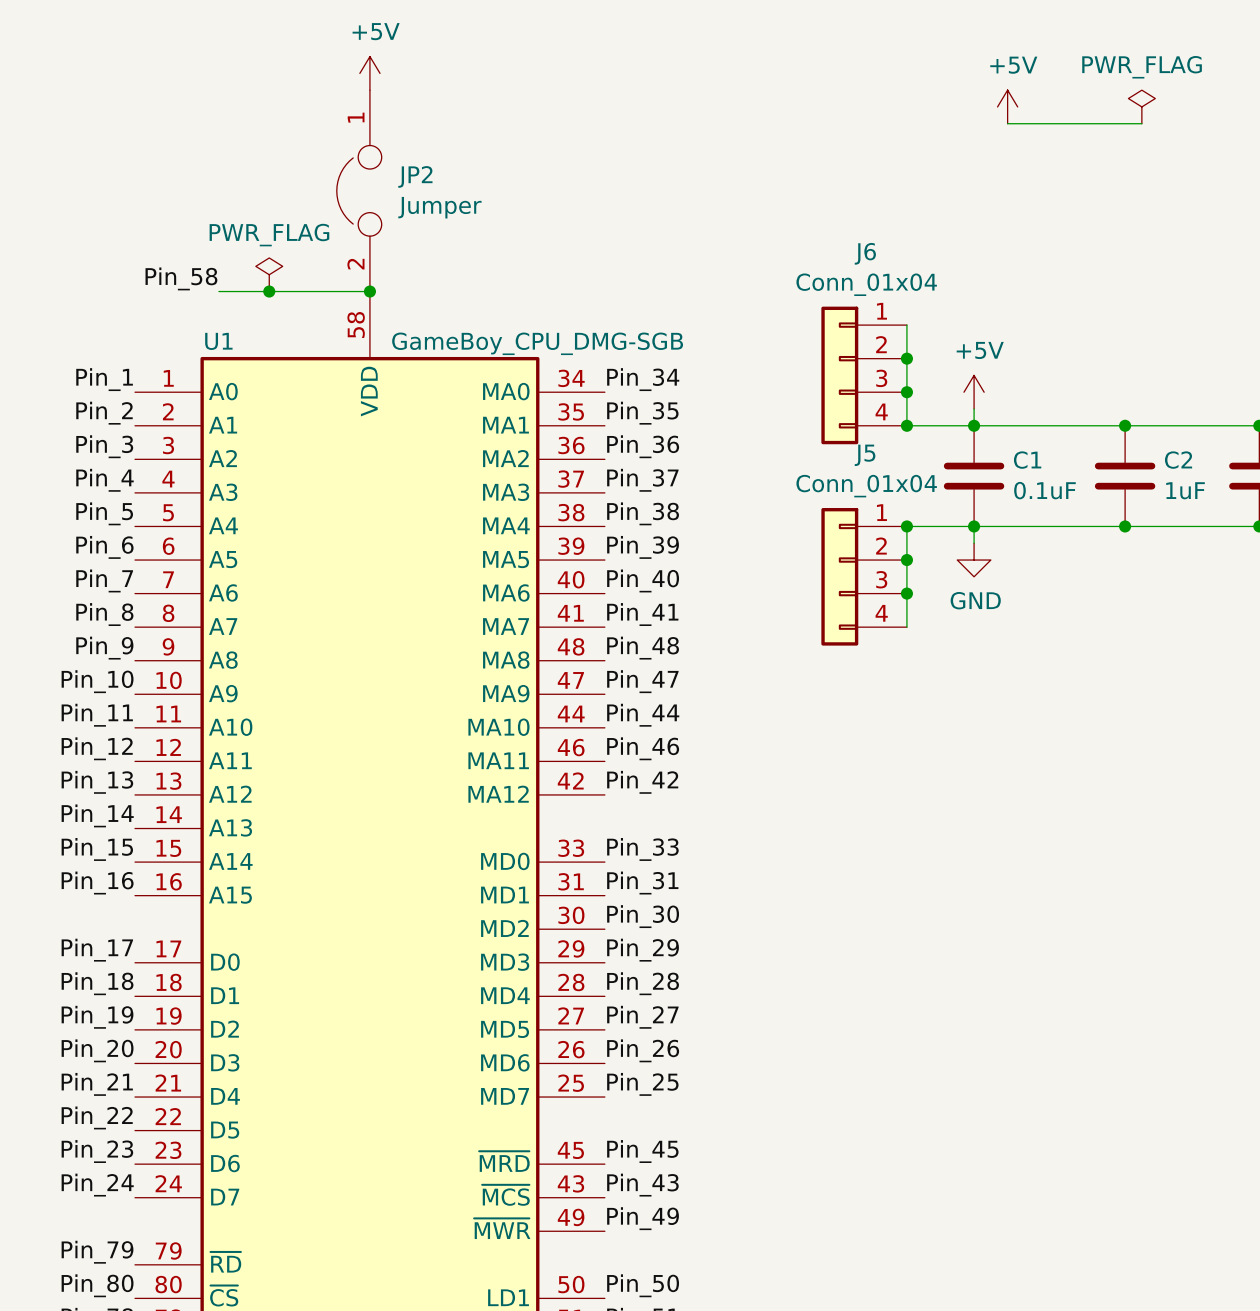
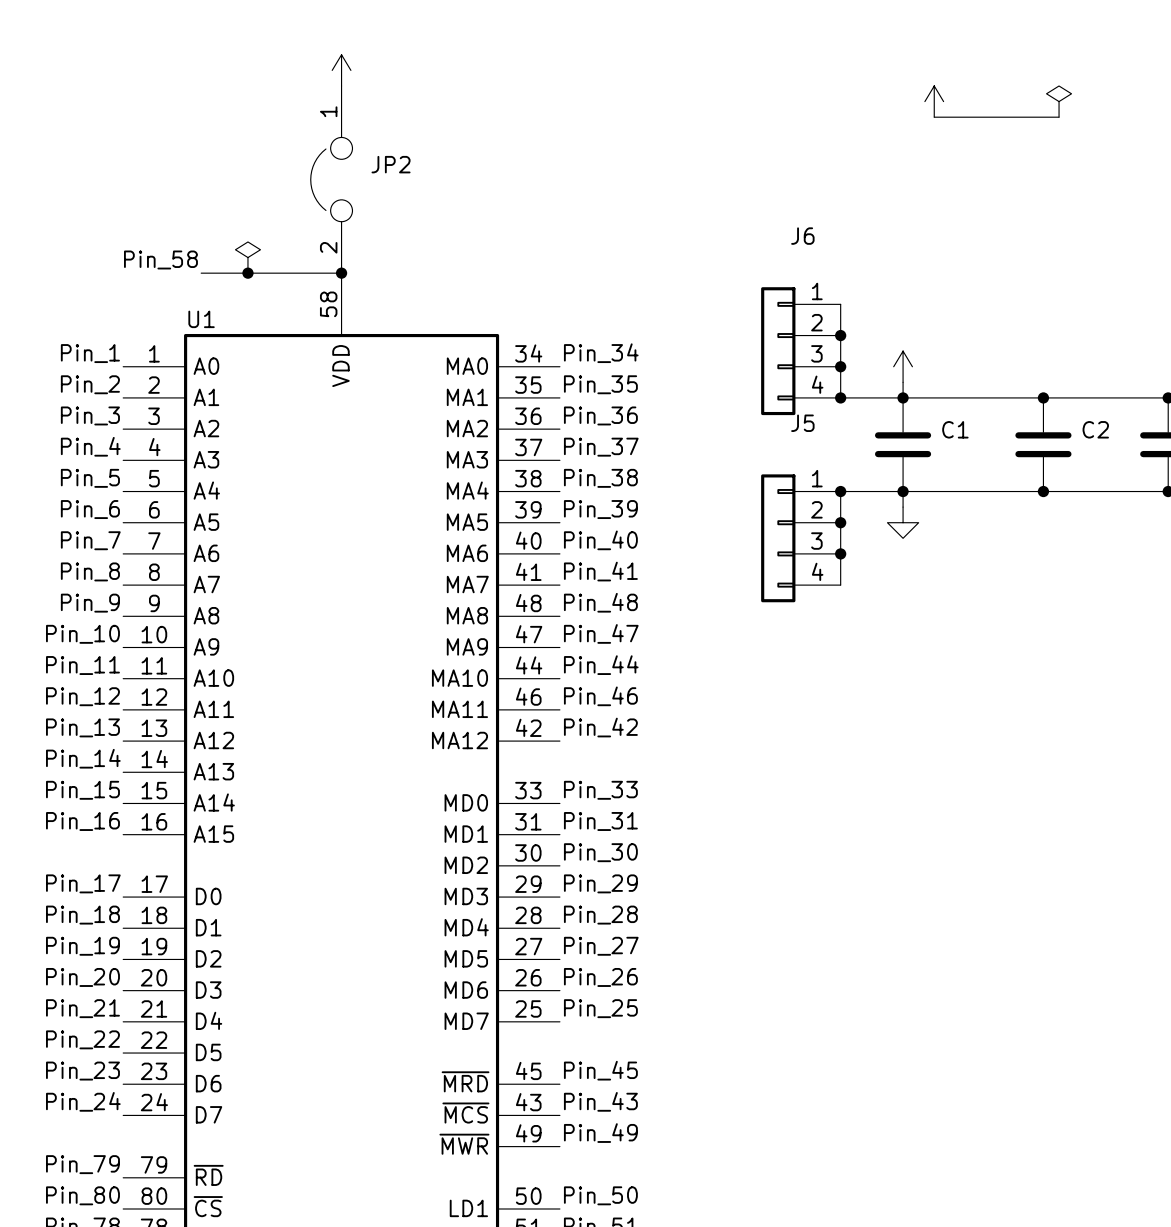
power symbol text: +5V (376, 31) -> none
power symbol text: +5V (1013, 65) -> none
power symbol text: PWR_FLAG (1142, 67) -> none
JP2 value: Jumper (439, 207) -> none
power symbol text: PWR_FLAG (269, 235) -> none
J6 value: Conn_01x04 (866, 284) -> none
U1 value: GameBoy_CPU_DMG-SGB (537, 343) -> none
power symbol text: +5V (980, 350) -> none
J5 value: Conn_01x04 (866, 486) -> none
C1 value: 0.1uF (1044, 490) -> none
C2 value: 1uF (1185, 490) -> none
power symbol text: GND (975, 600) -> none

